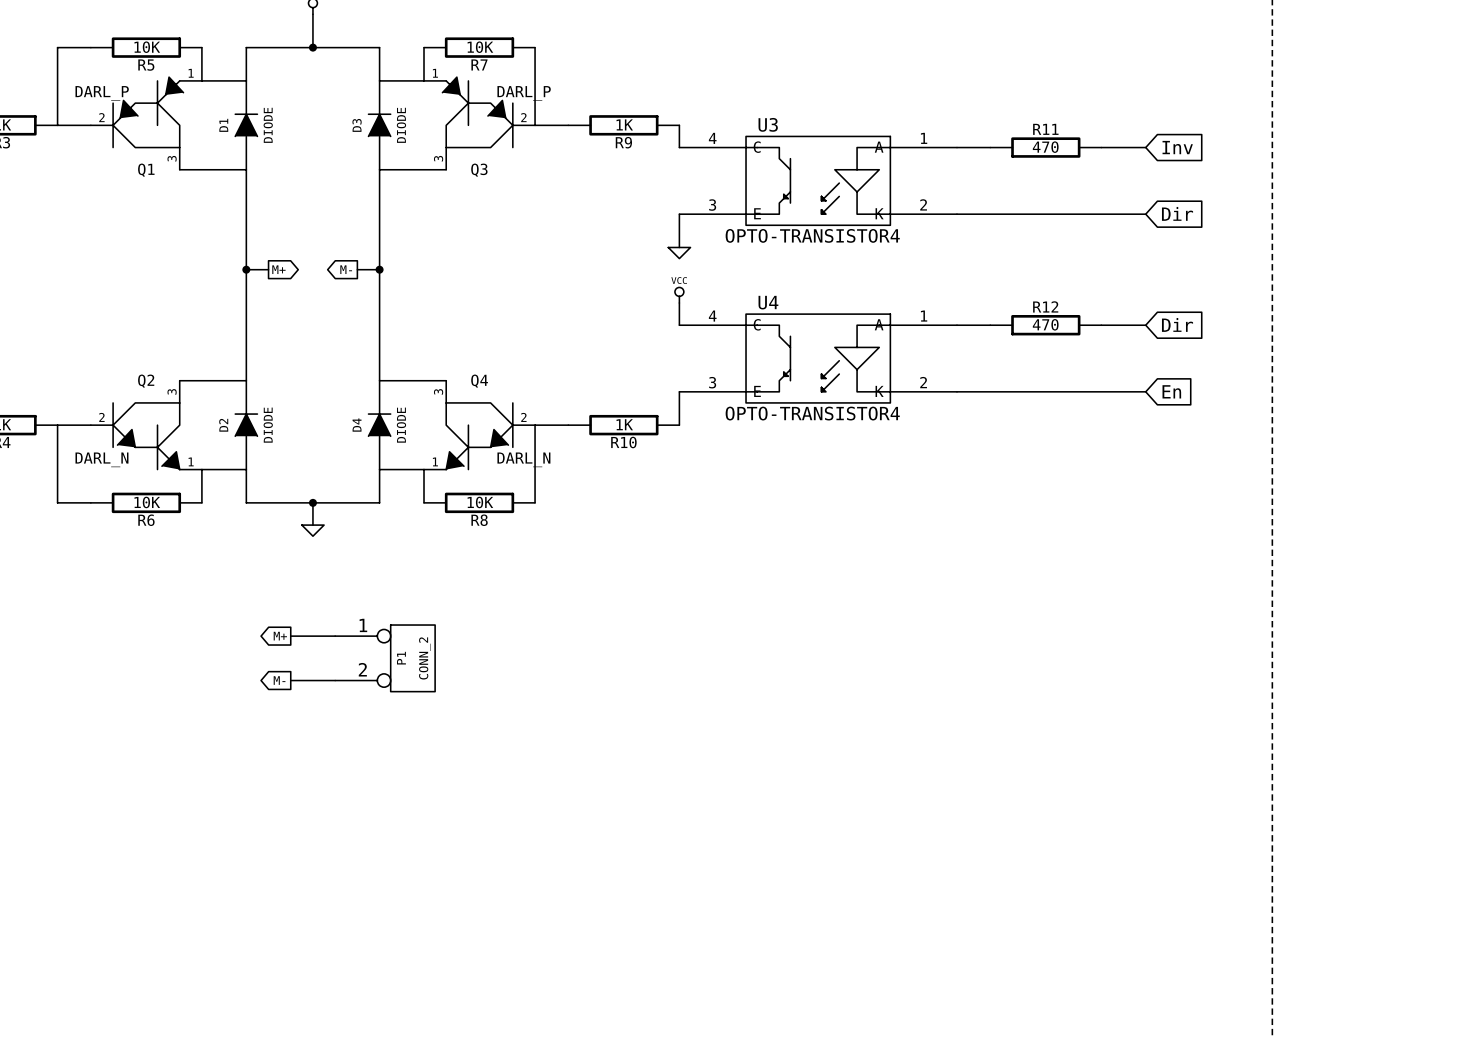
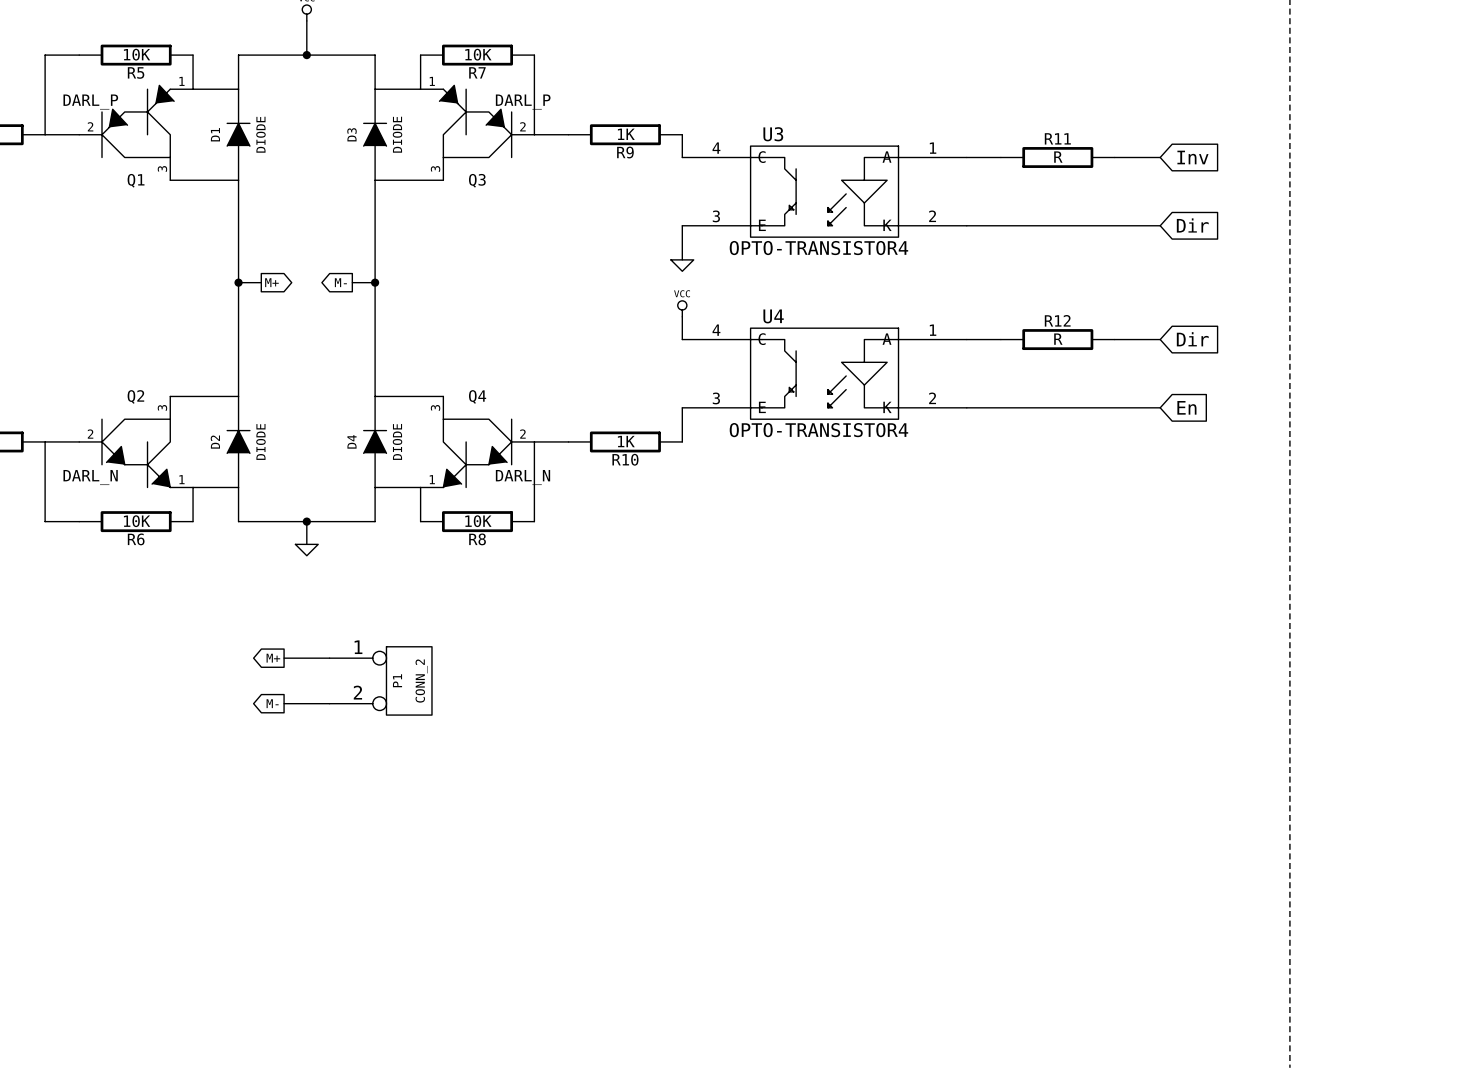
R11 value: 470 (1045, 147) -> R (1058, 157)
R12 value: 470 (1045, 324) -> R (1058, 339)

